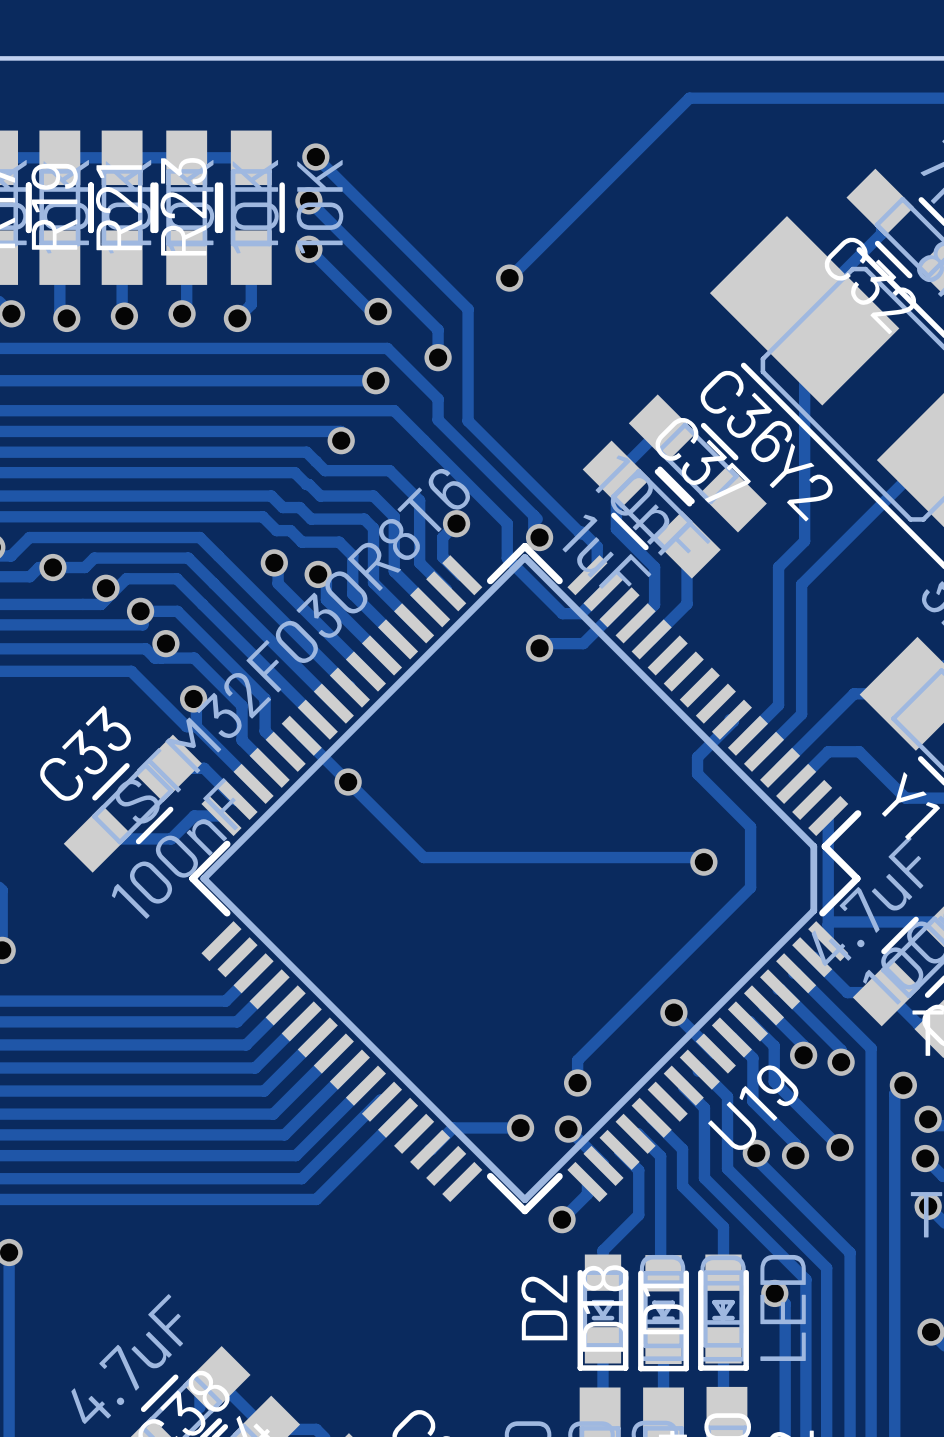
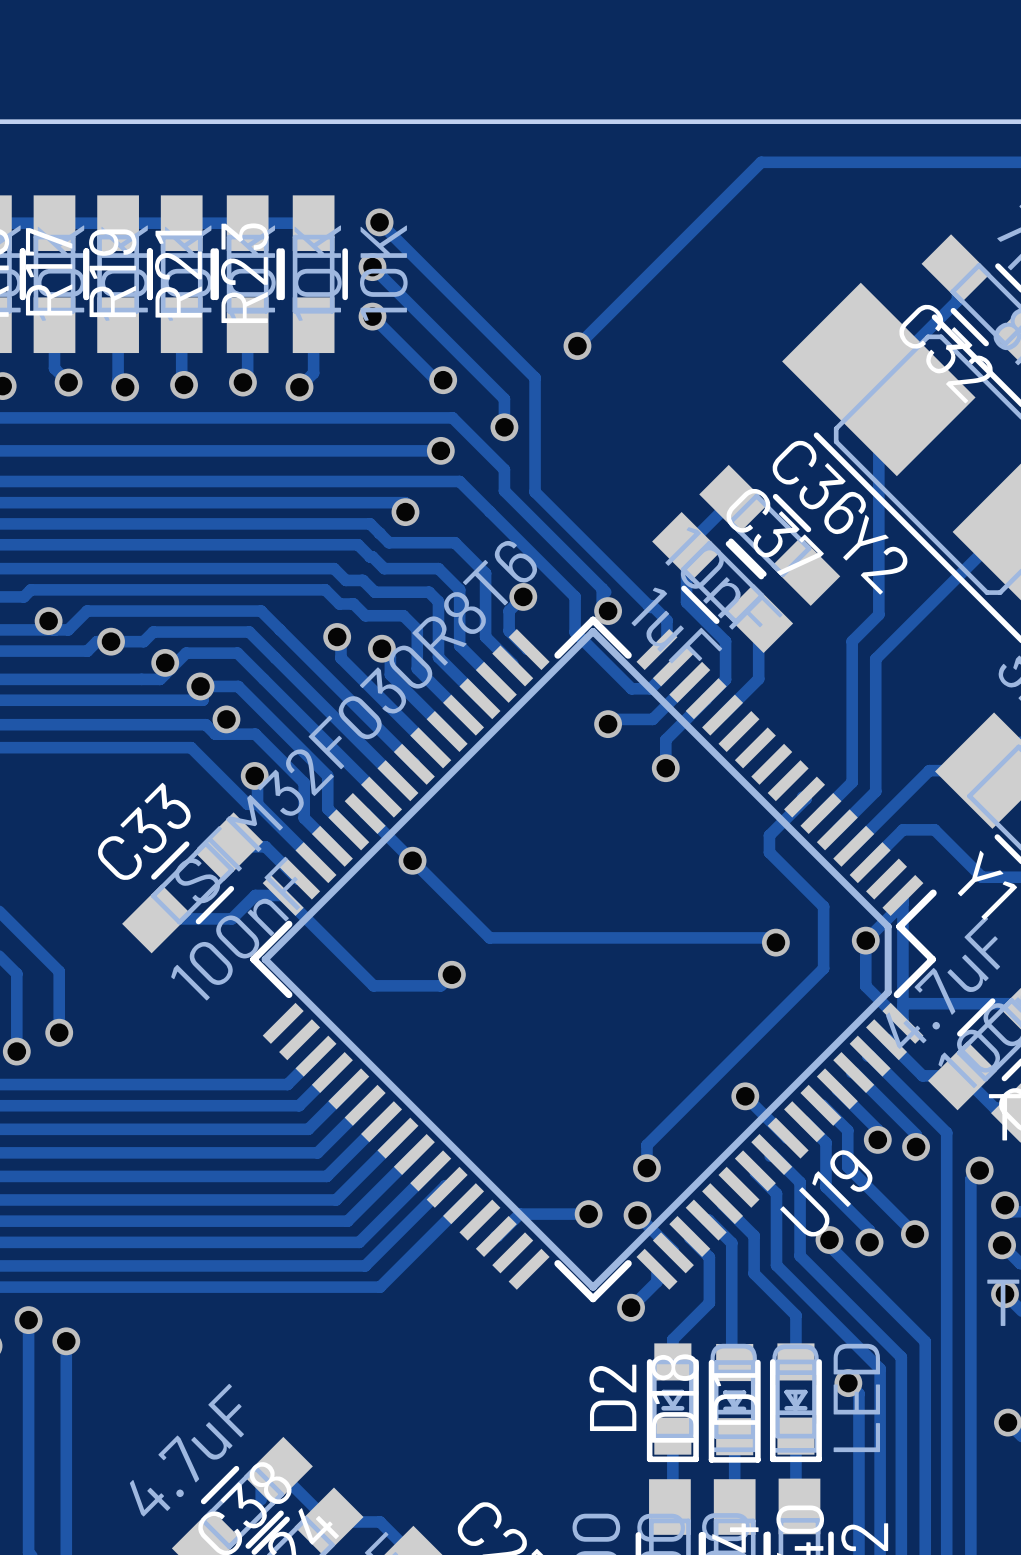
track: none -> (706, 699) (665, 739) (665, 768)
via: none -> (665, 768)
track: none -> (283, 895) (373, 985) (440, 985) (451, 974)
track: none -> (902, 903) (865, 940) (865, 986) (902, 1023)
via: none -> (865, 940)
via: none -> (451, 974)

